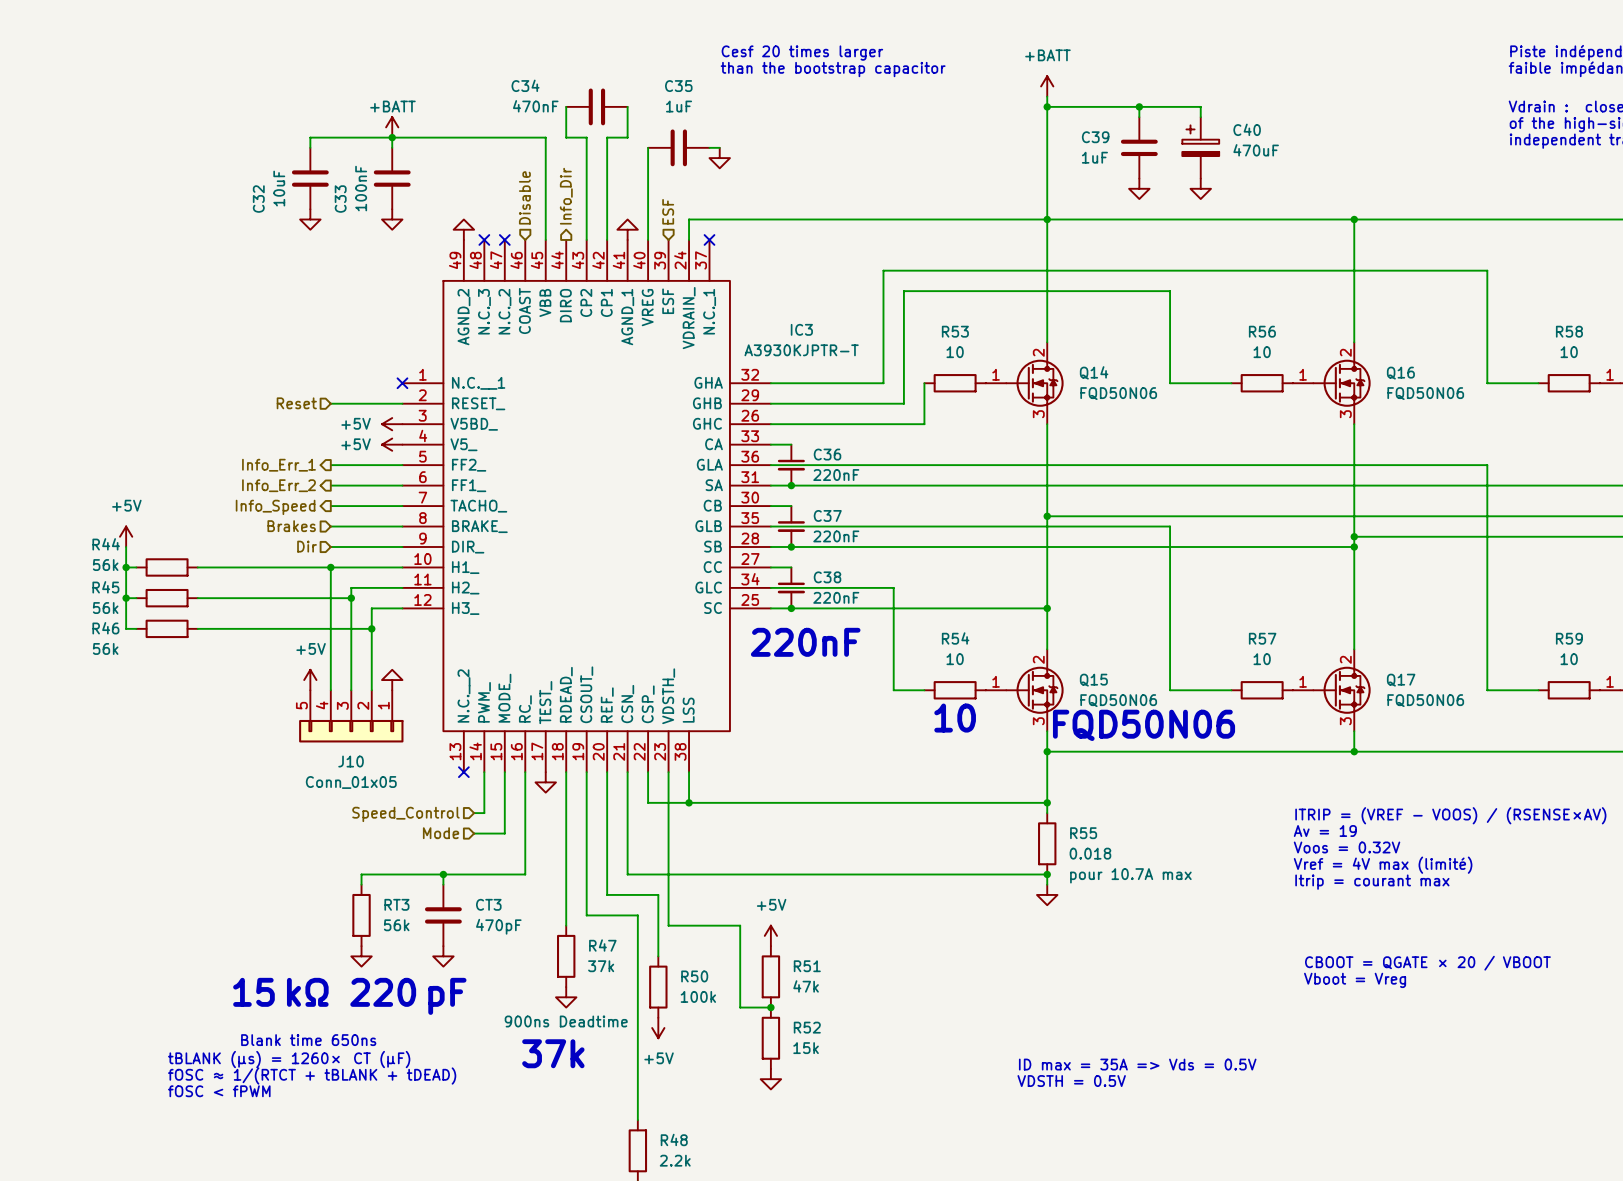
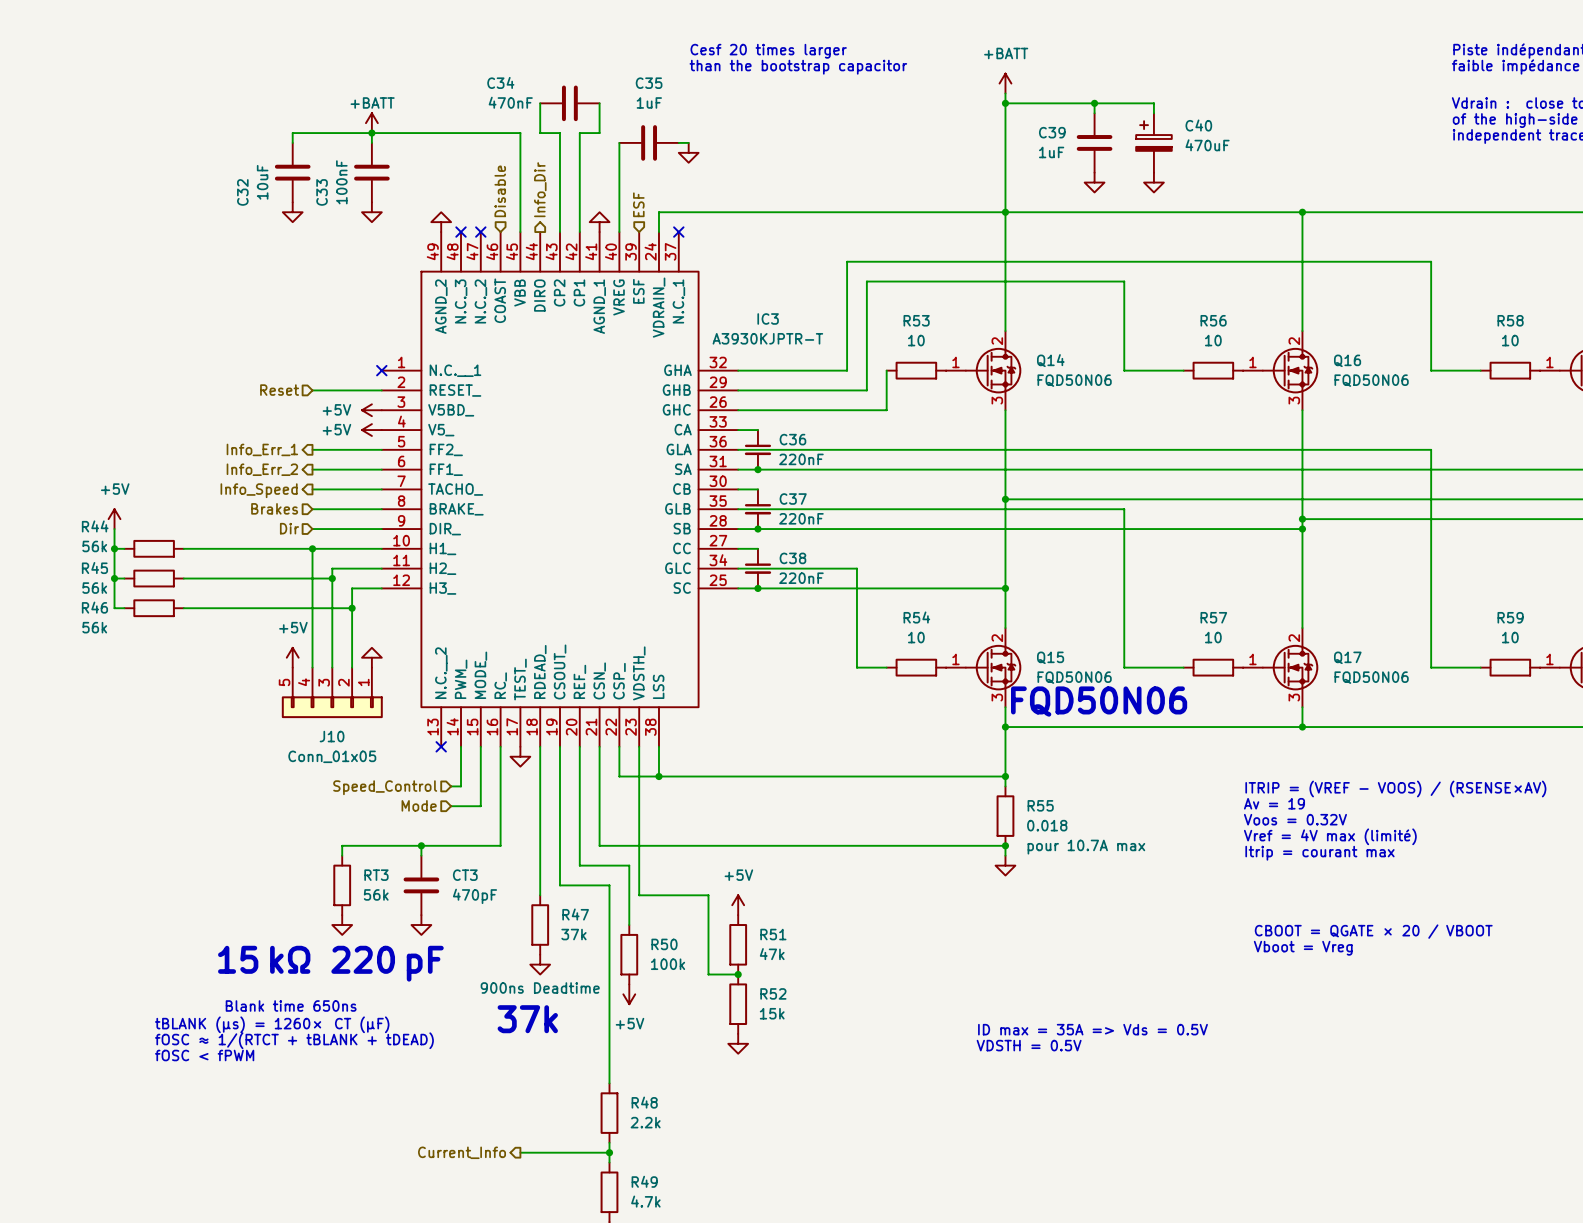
text: 220nF (805, 642) -> none
text: 10 (955, 718) -> none

